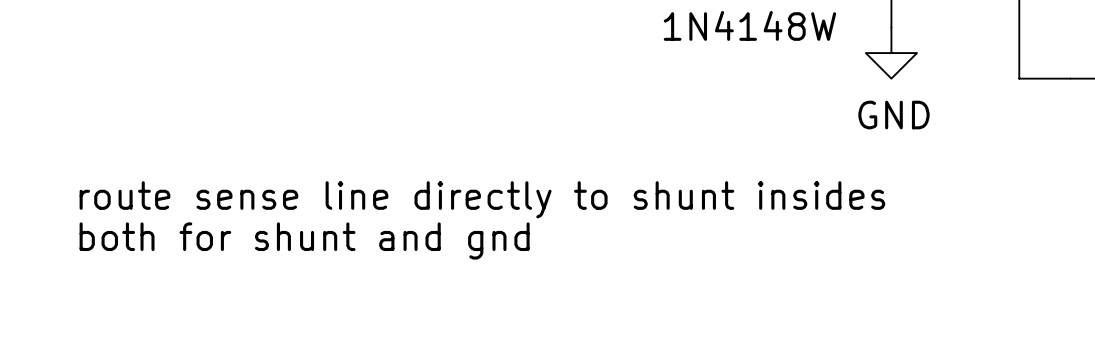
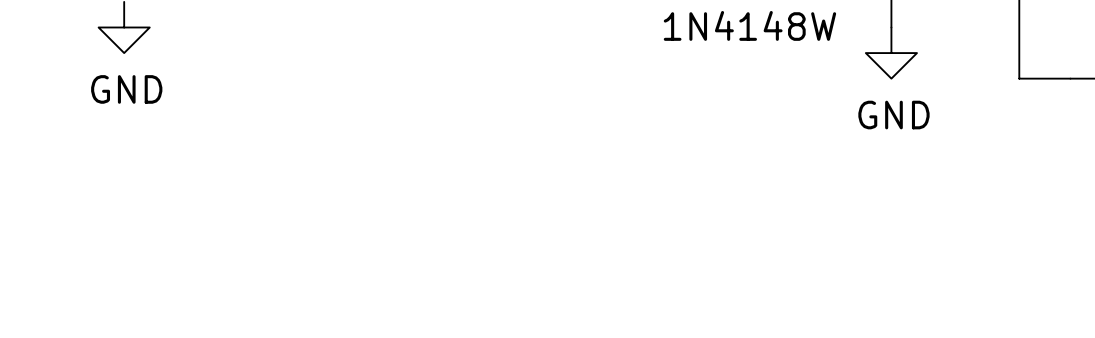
power symbol: none -> GND (124, 27)
text: route sense line directly to shunt insides (482, 199) -> none
text: both for shunt and gnd (304, 240) -> none

